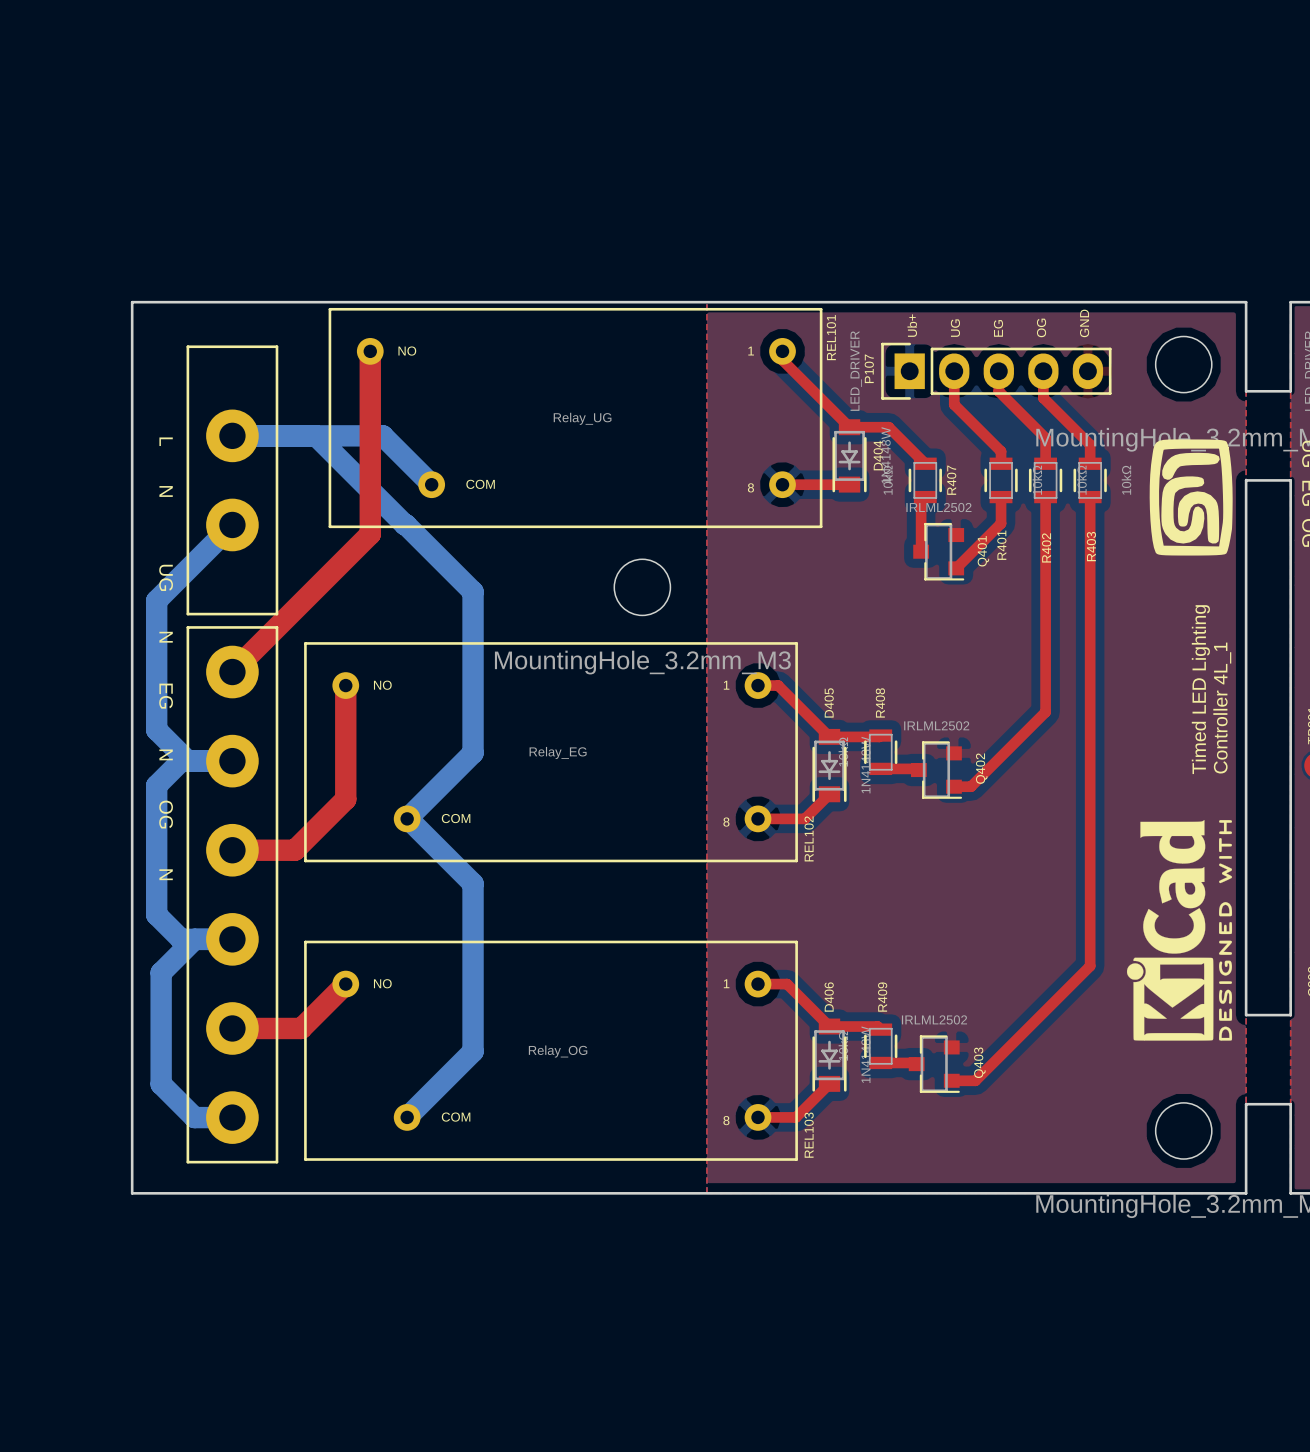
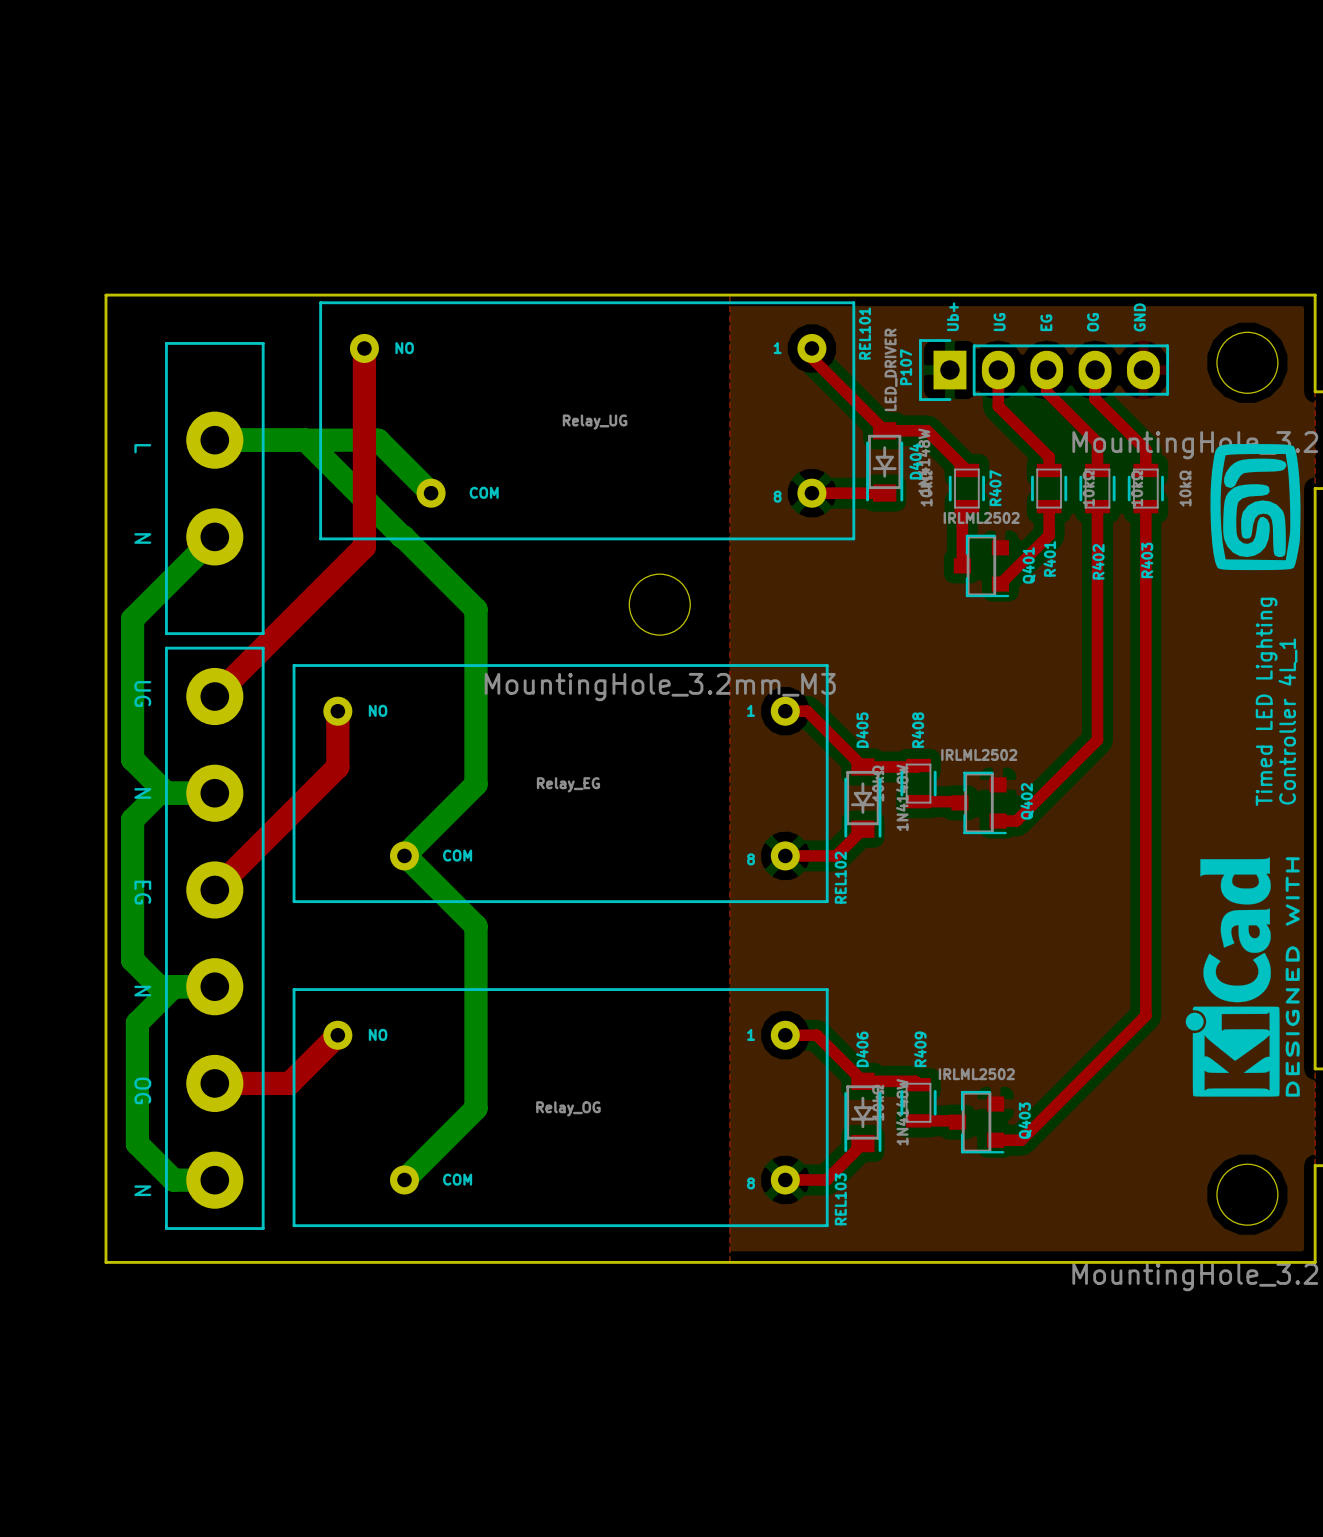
top track: (345, 736) (345, 799) (294, 850) (232, 850) -> (337, 766) (214, 889)

